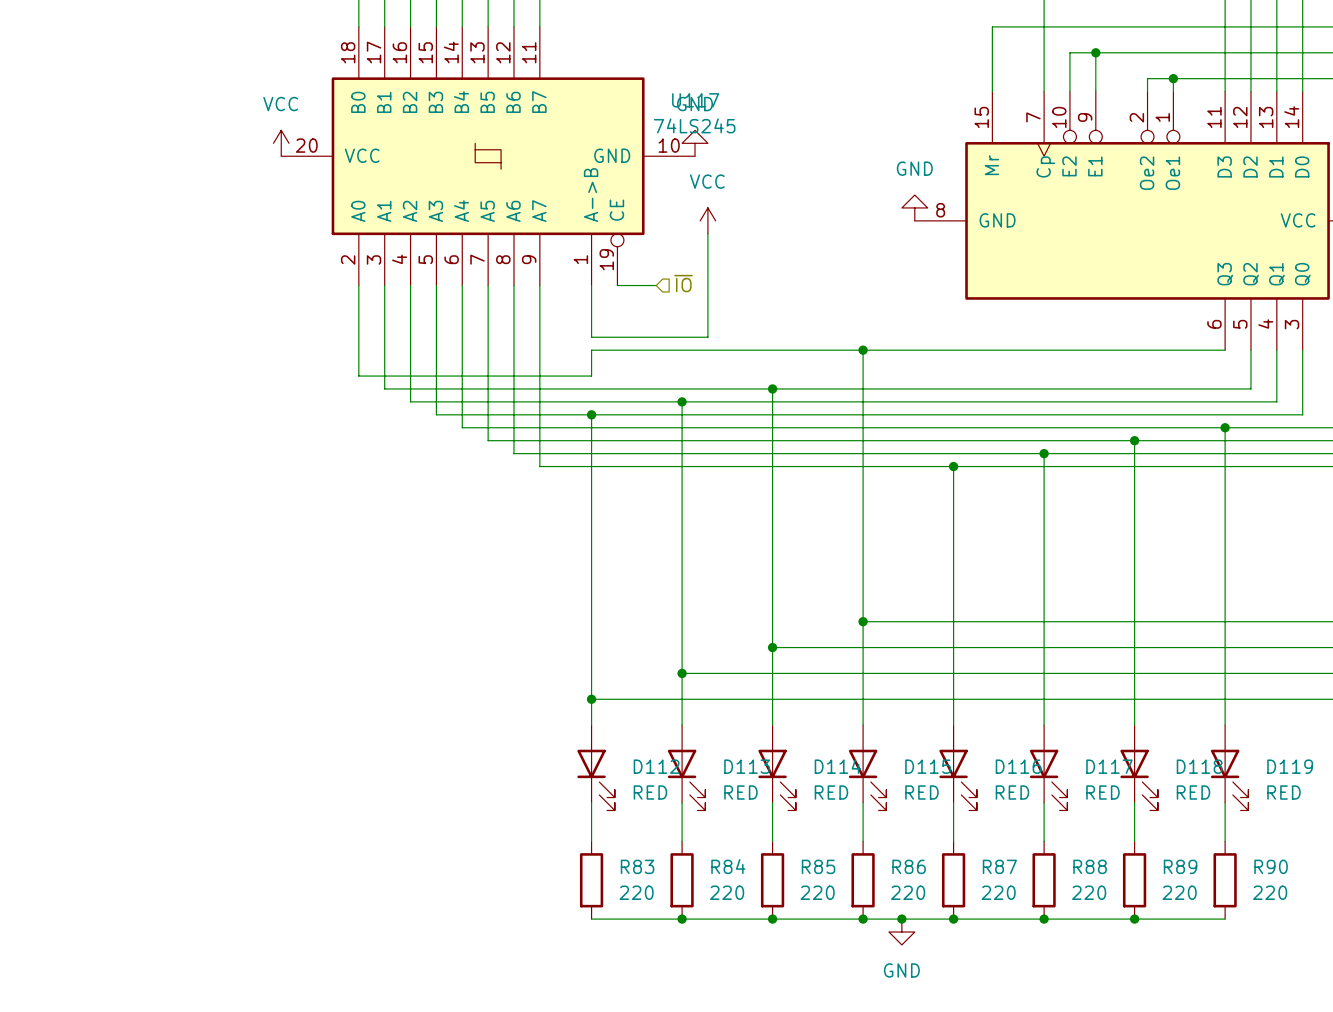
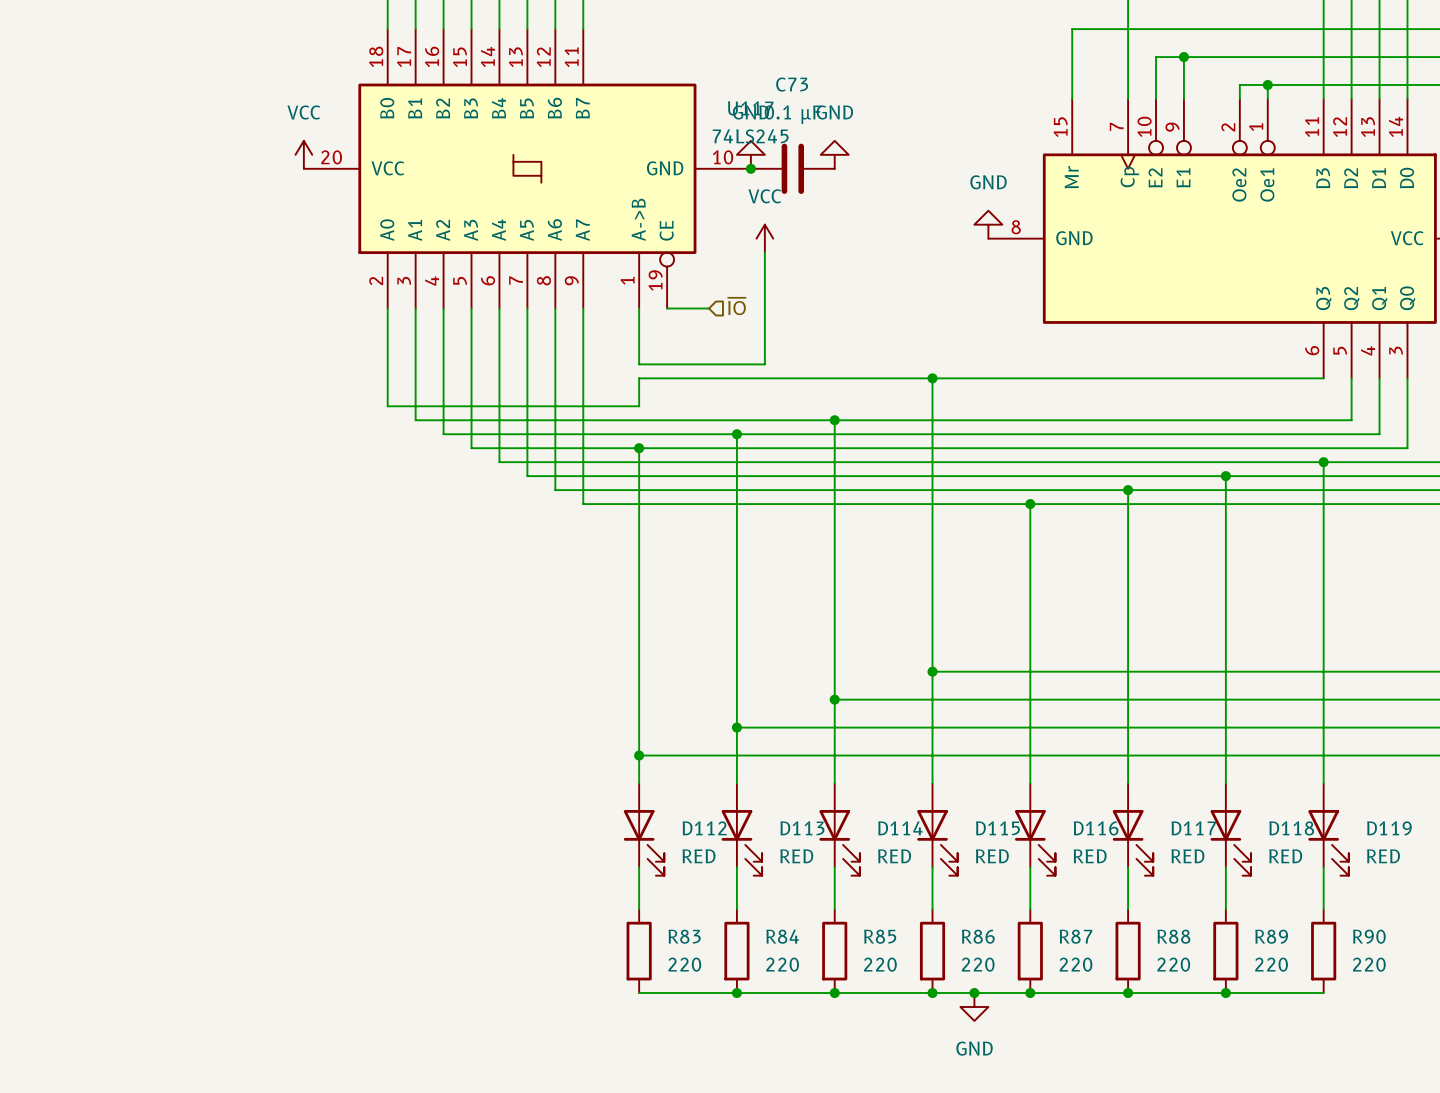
power symbol: none -> GND (834, 154)
junction: none -> (750, 168)
C73: none -> 0.1 µF (792, 168)

